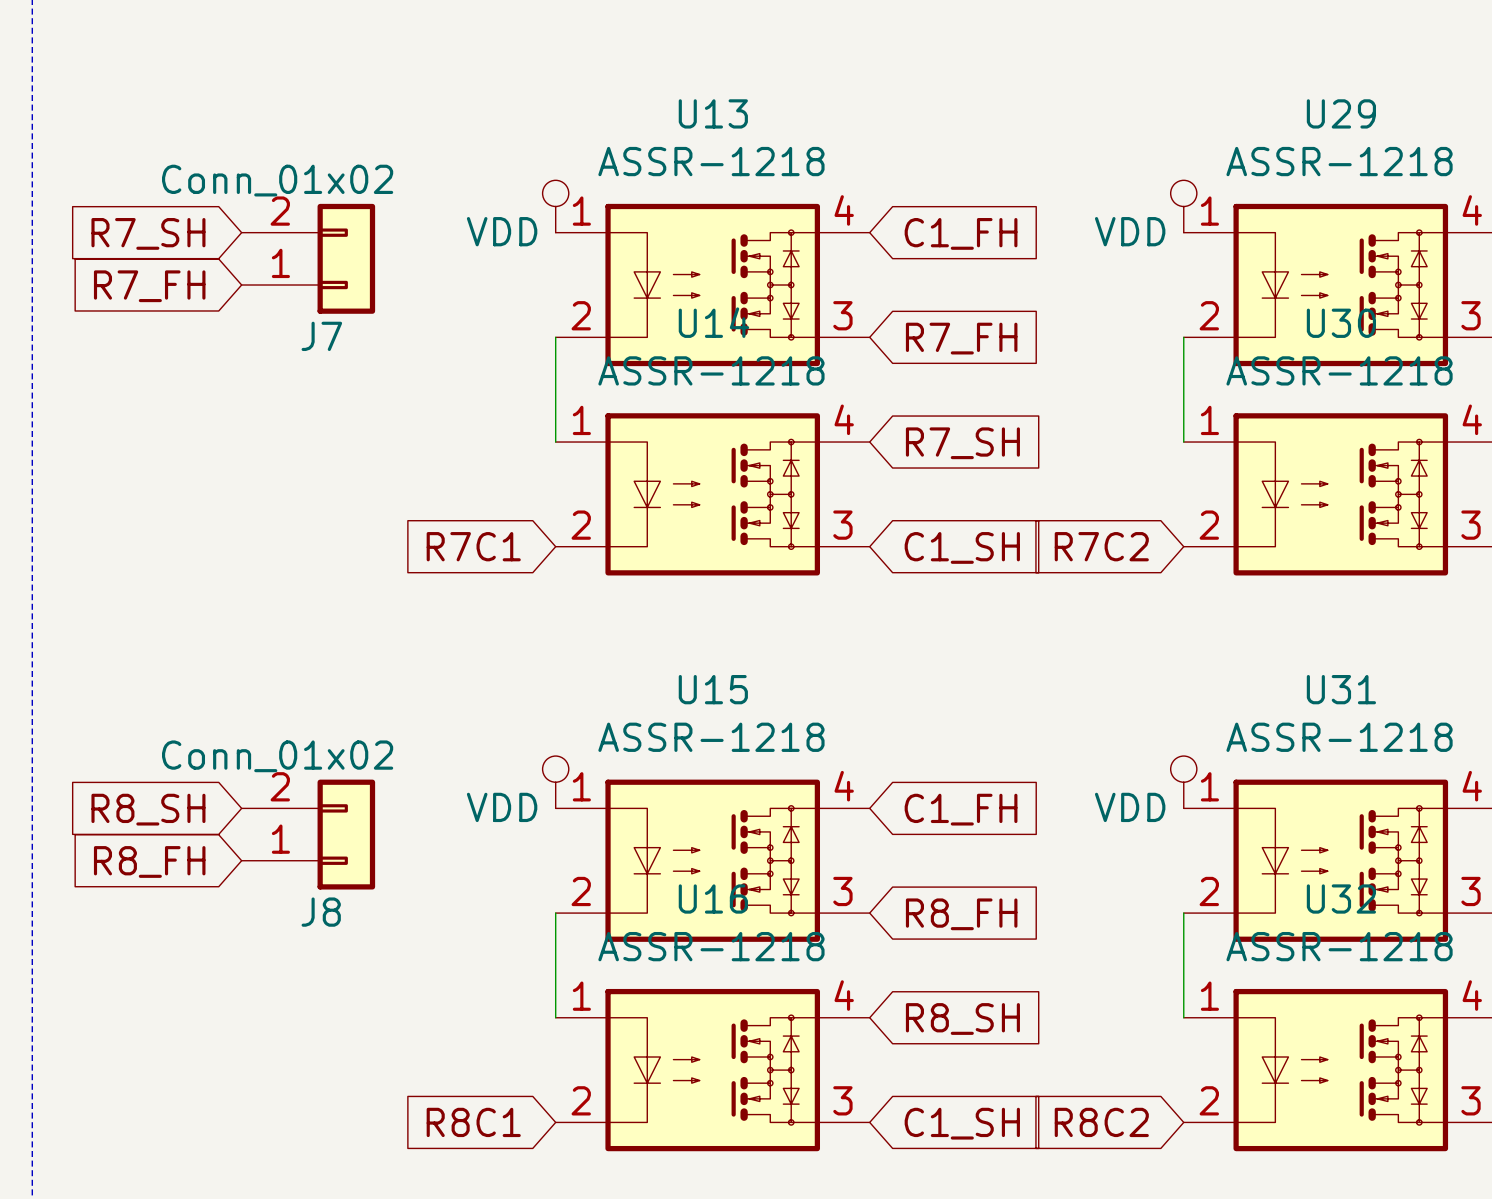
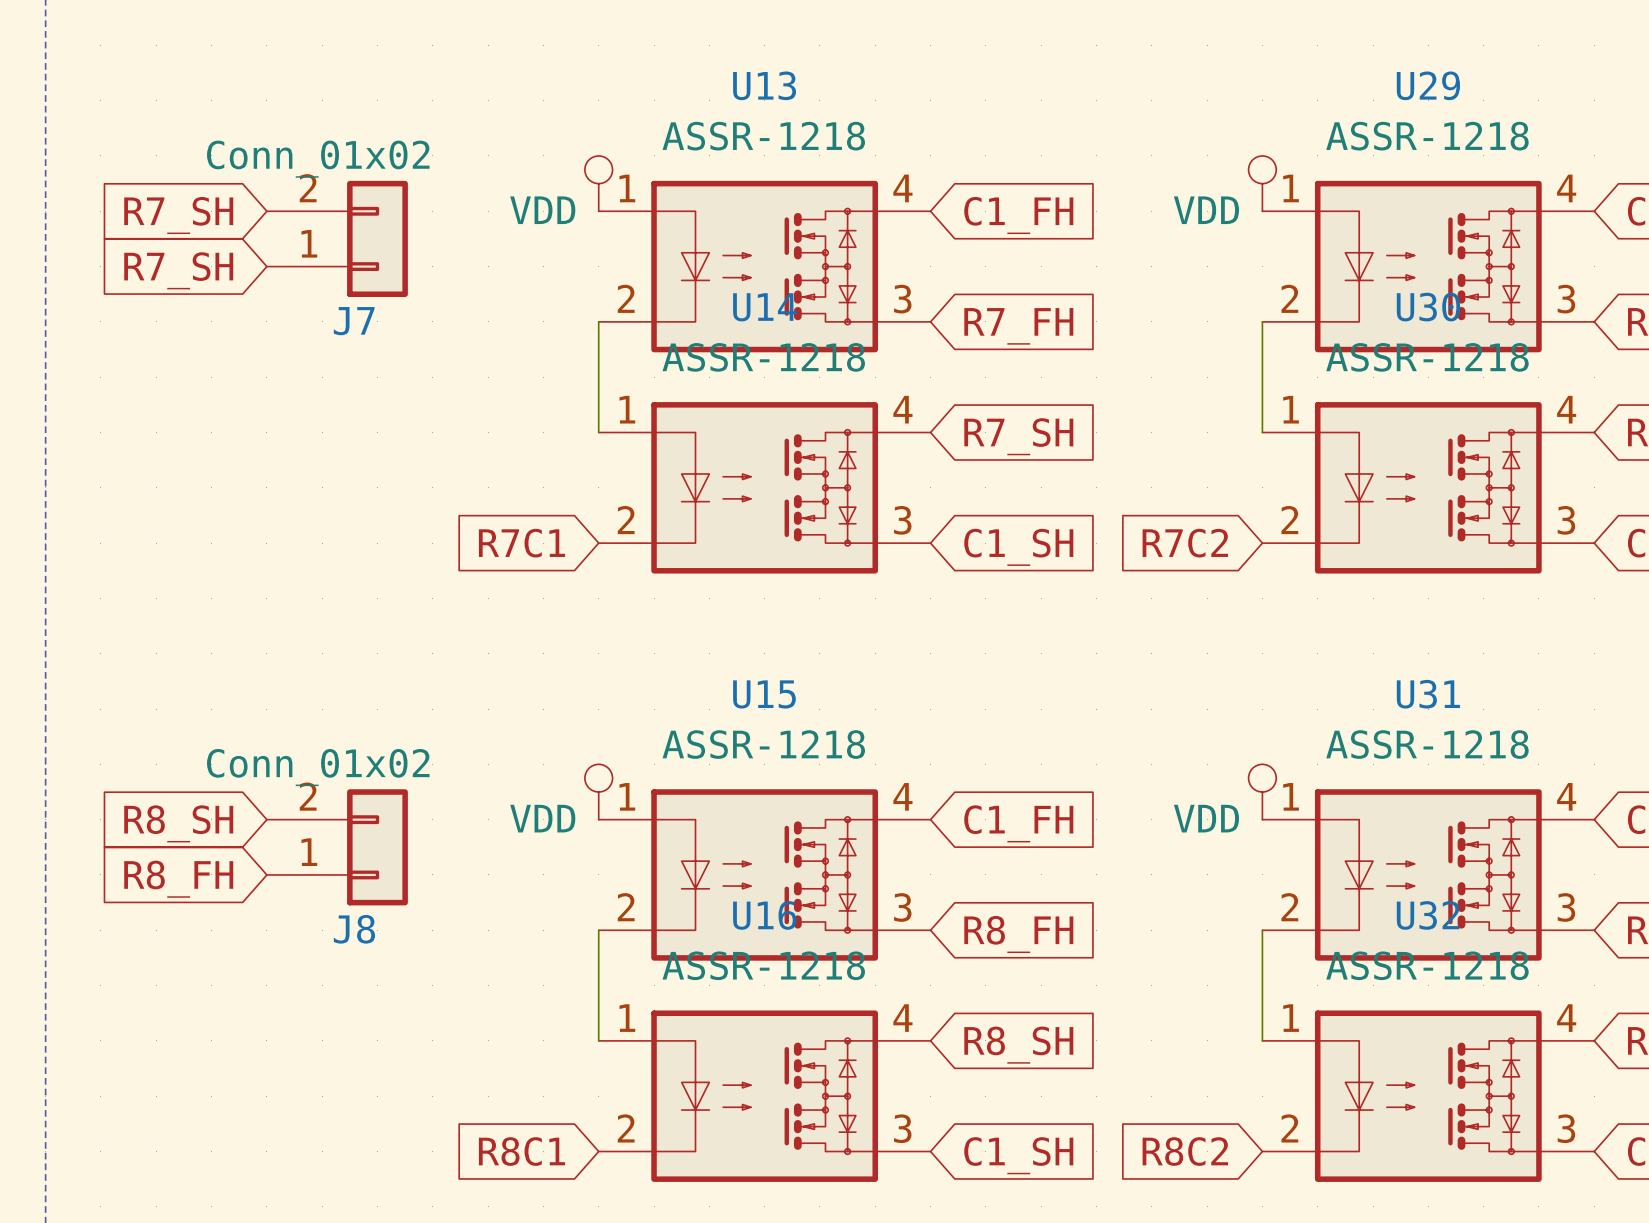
global label: R7_FH (149, 286) -> R7_SH (178, 270)

